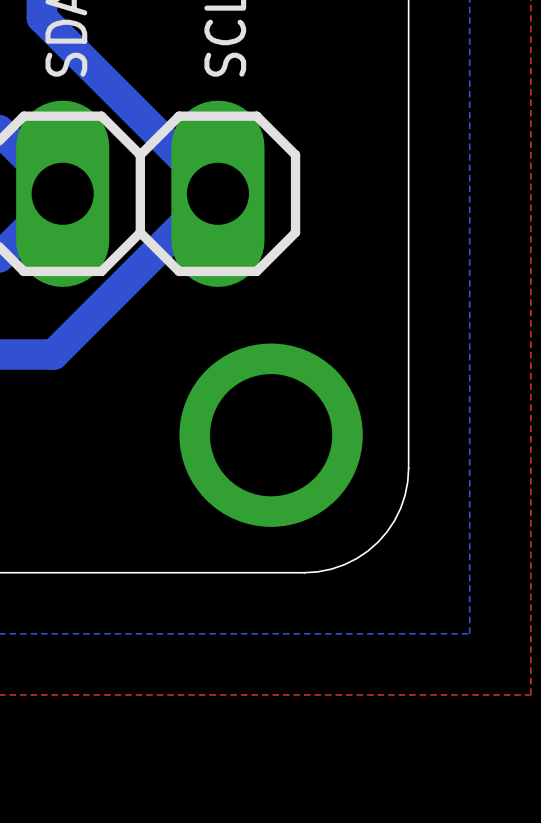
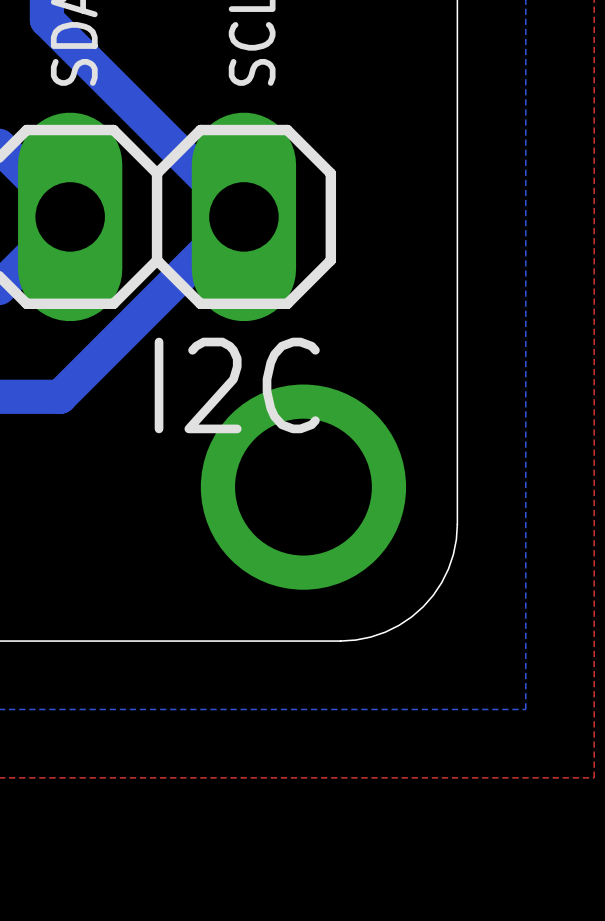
I2C name: none -> I2C (237, 385)

